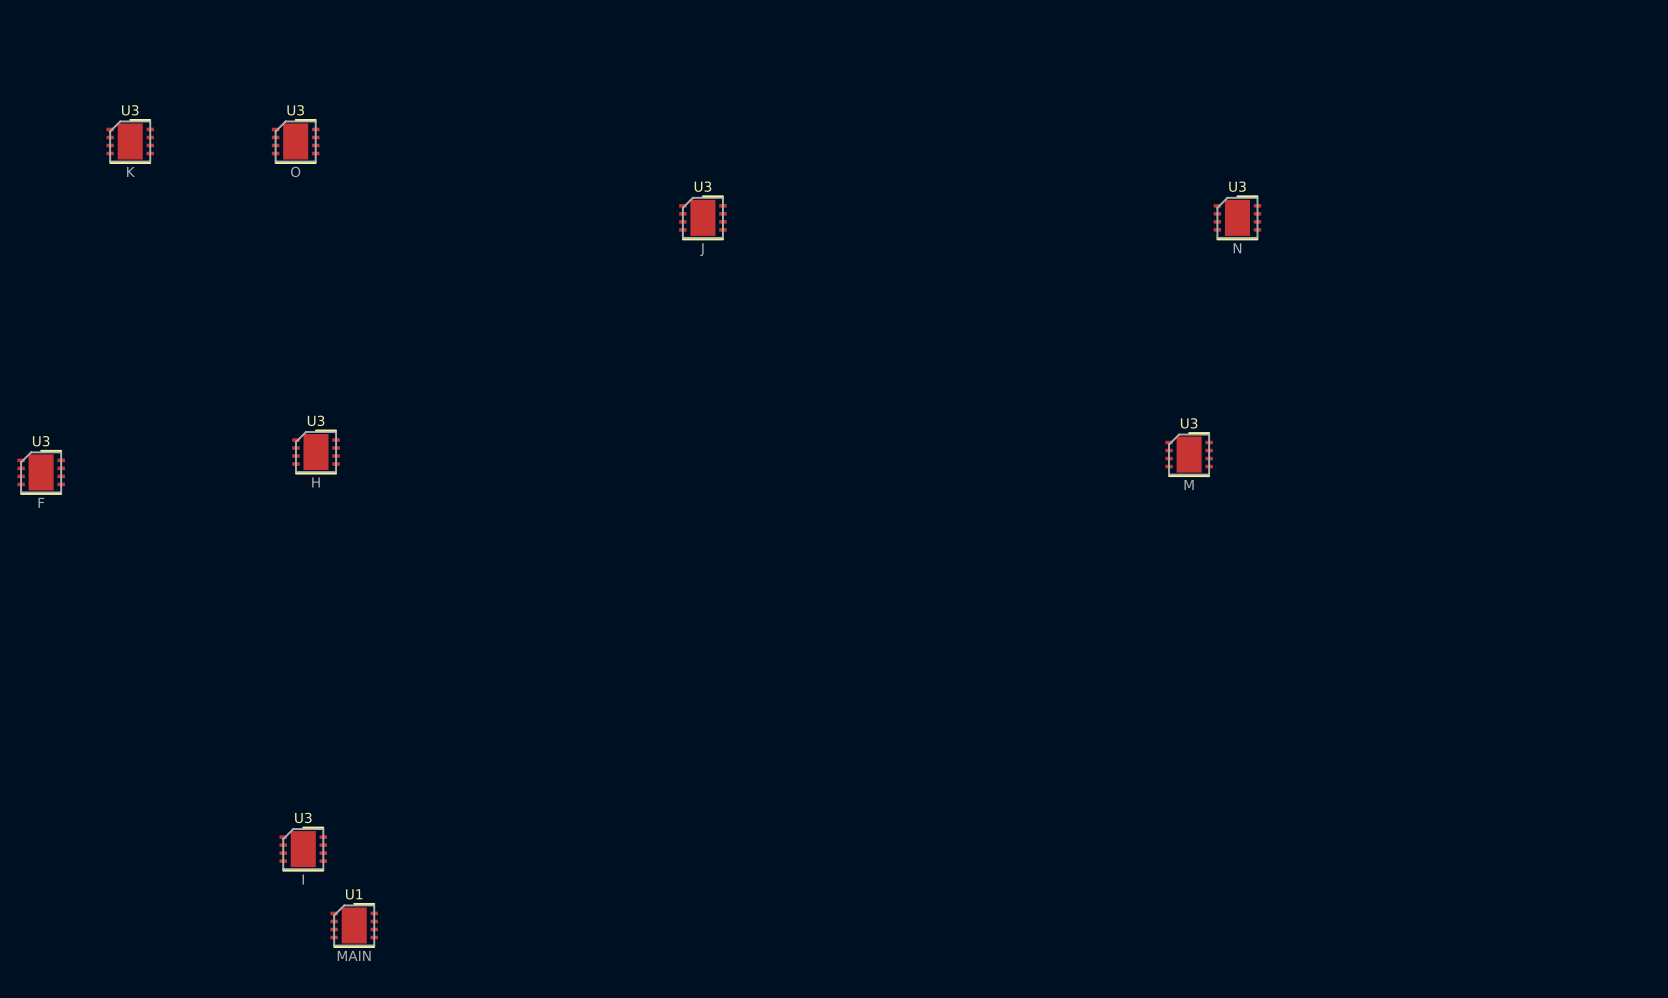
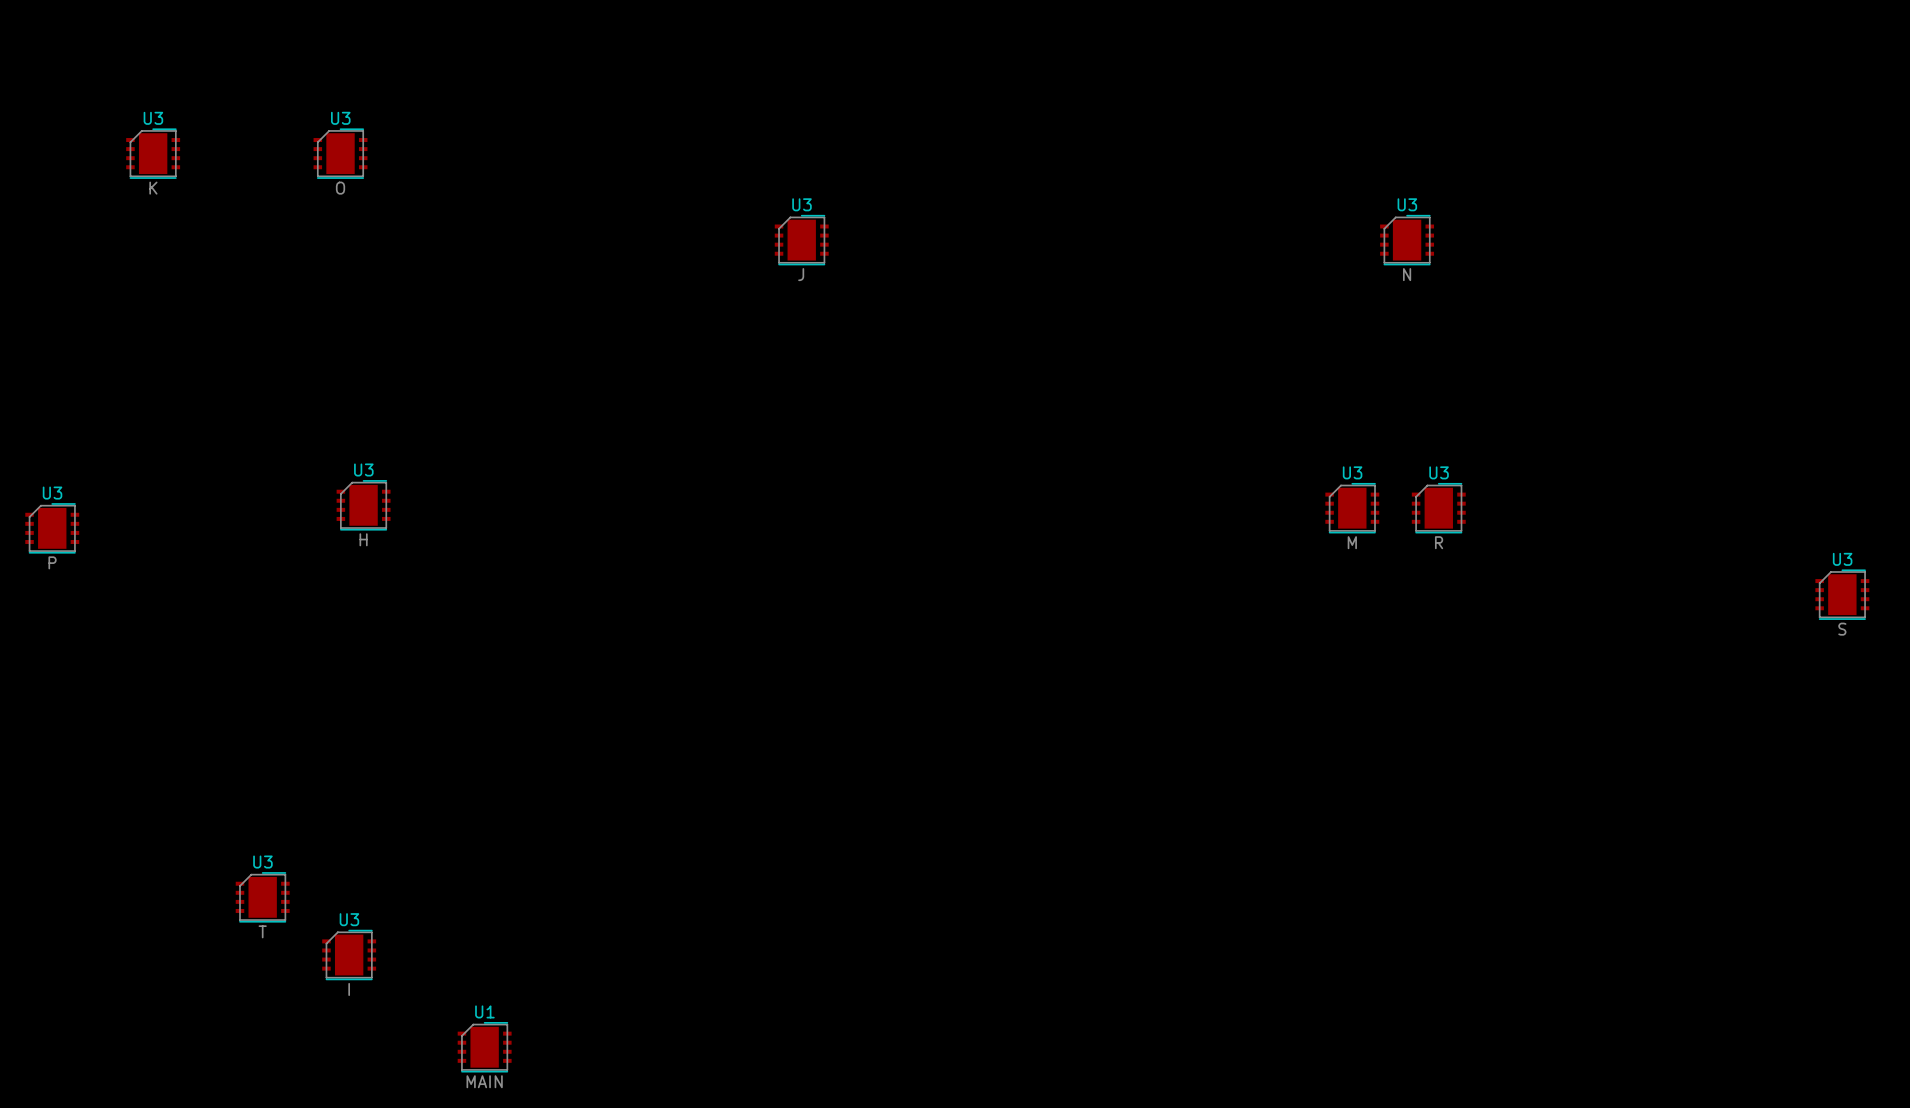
U3: none -> R (1438, 508)
U3 value: F (41, 502) -> P (52, 562)
U3: none -> S (1842, 594)
U3: none -> T (262, 897)
U1 position: (354, 925) -> (484, 1047)

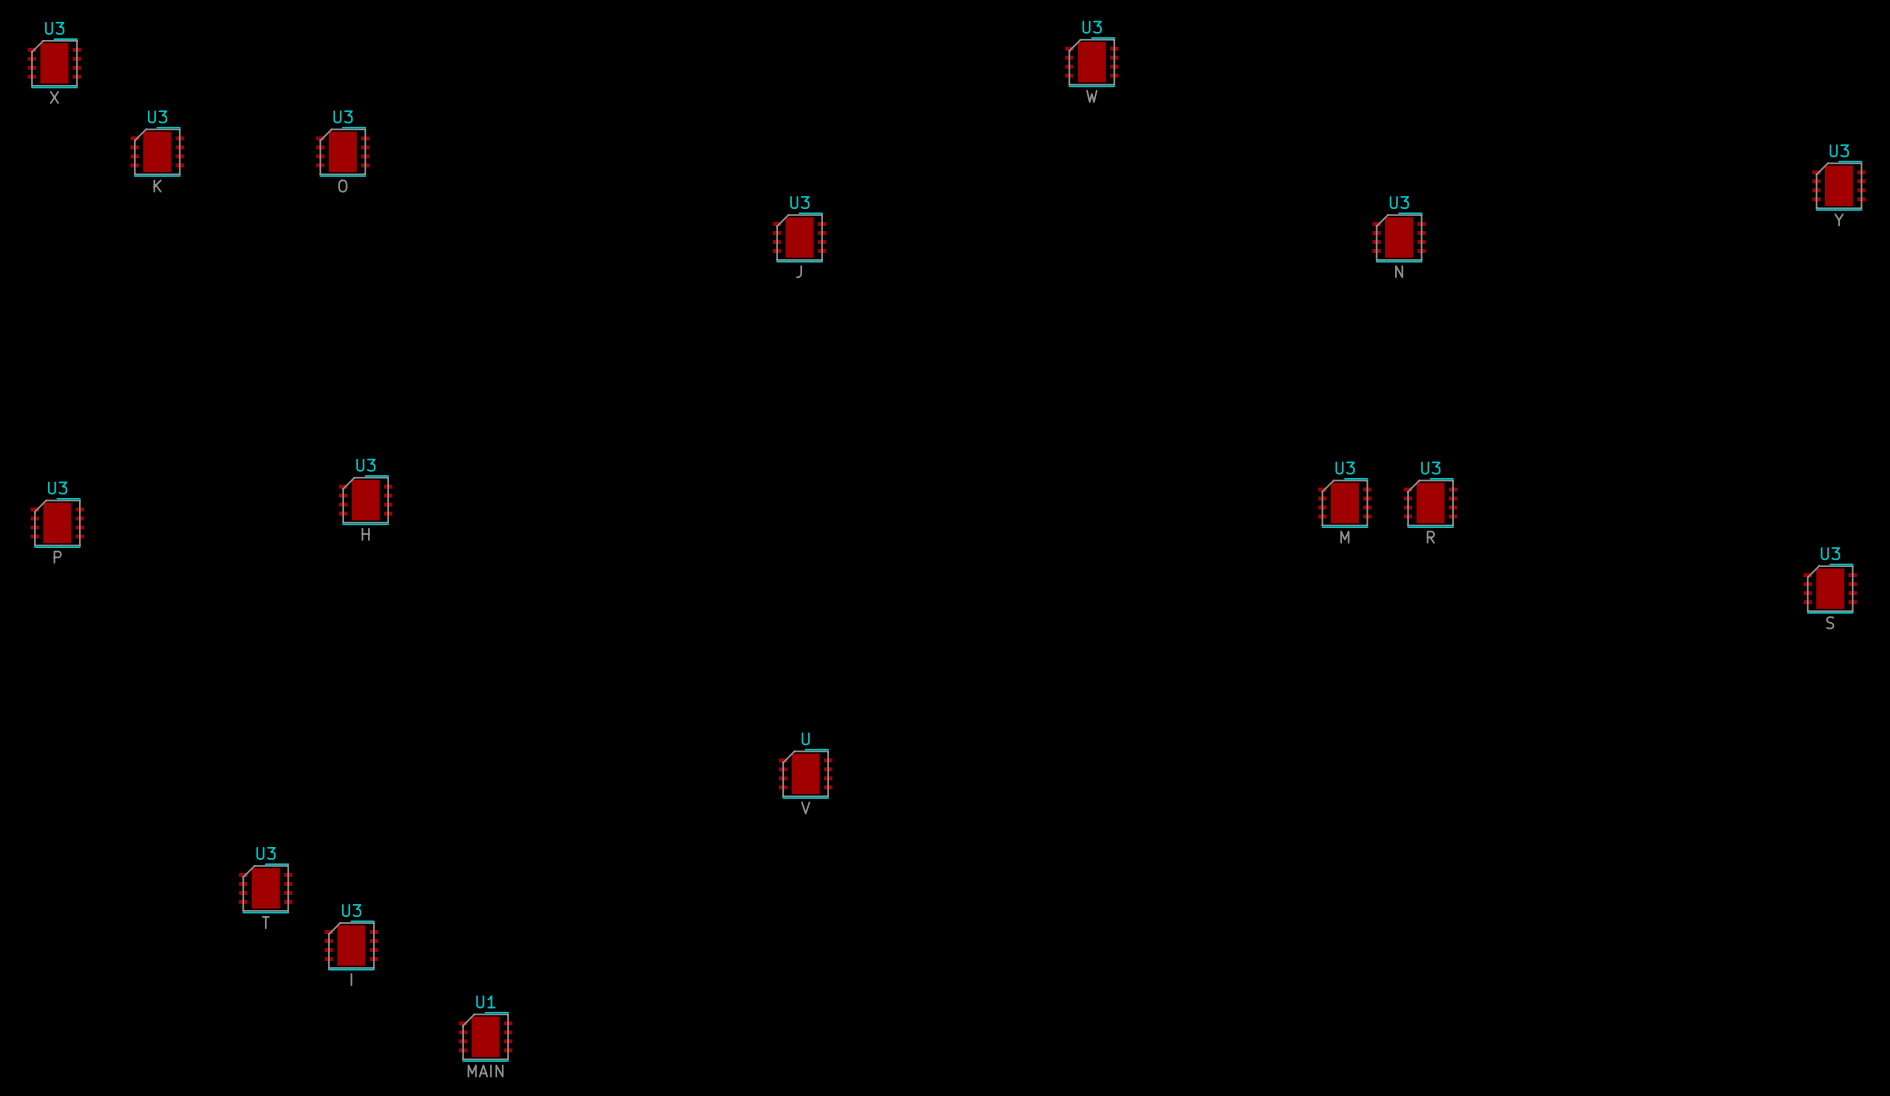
U3: none -> W (1091, 62)
U3: none -> X (54, 63)
U3: none -> Y (1839, 185)
U: none -> V (805, 773)

